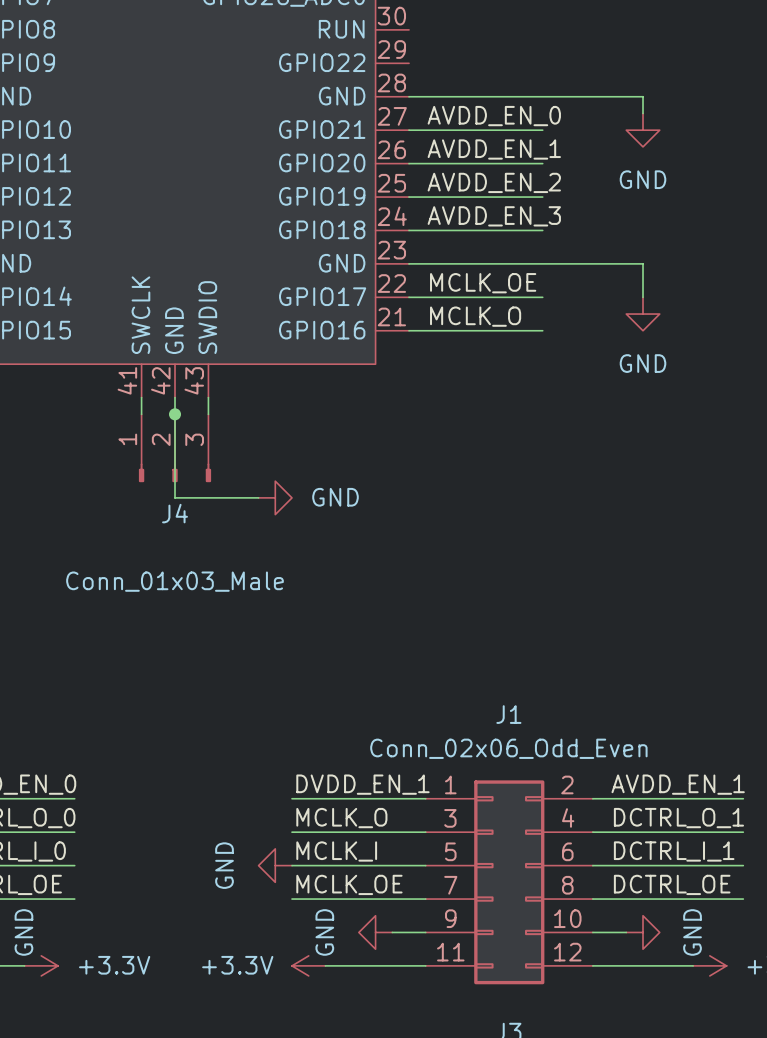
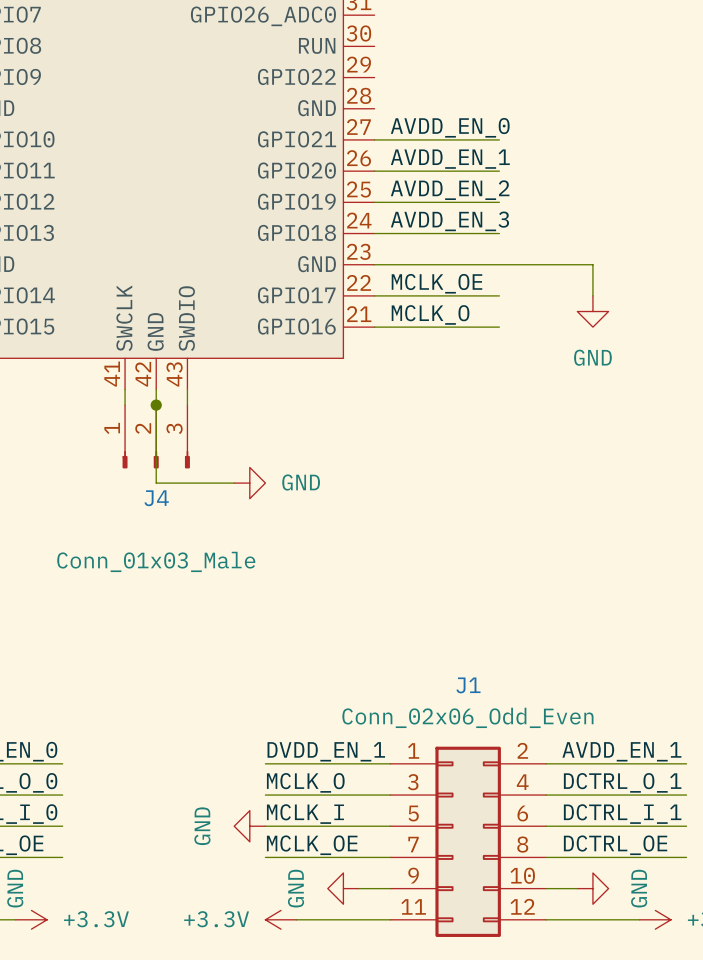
wire: (409, 96) (643, 96) (643, 113) -> none
power symbol: GND (643, 130) -> none

